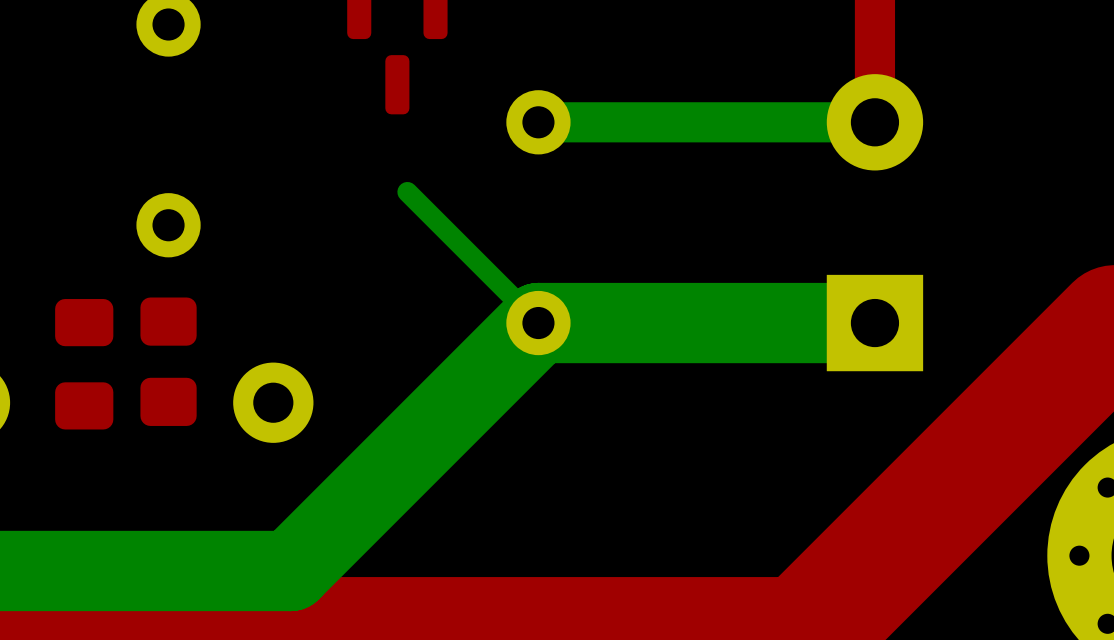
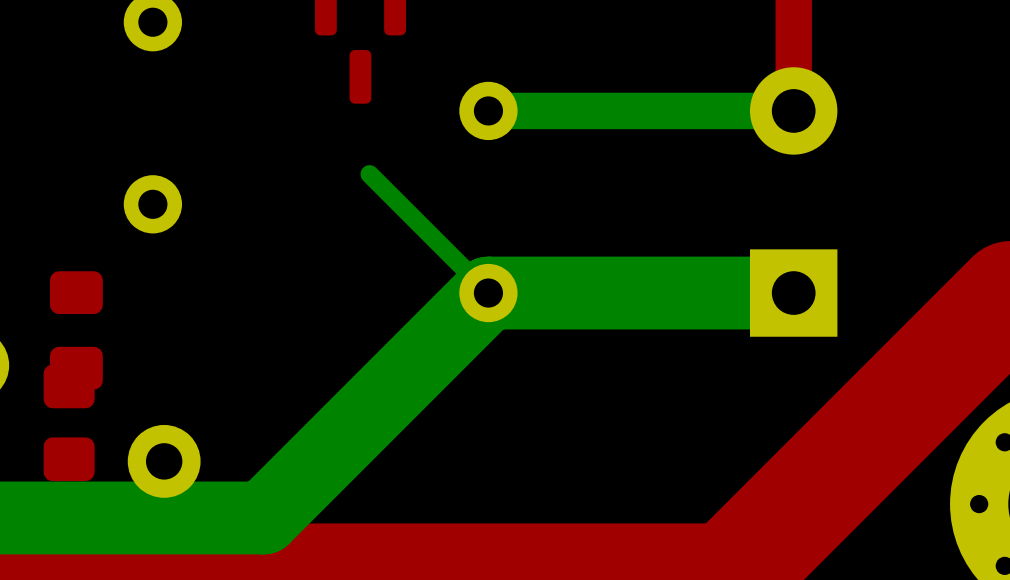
part: (168, 361) -> none
part position: (273, 402) -> (164, 461)
part: none -> (69, 422)

